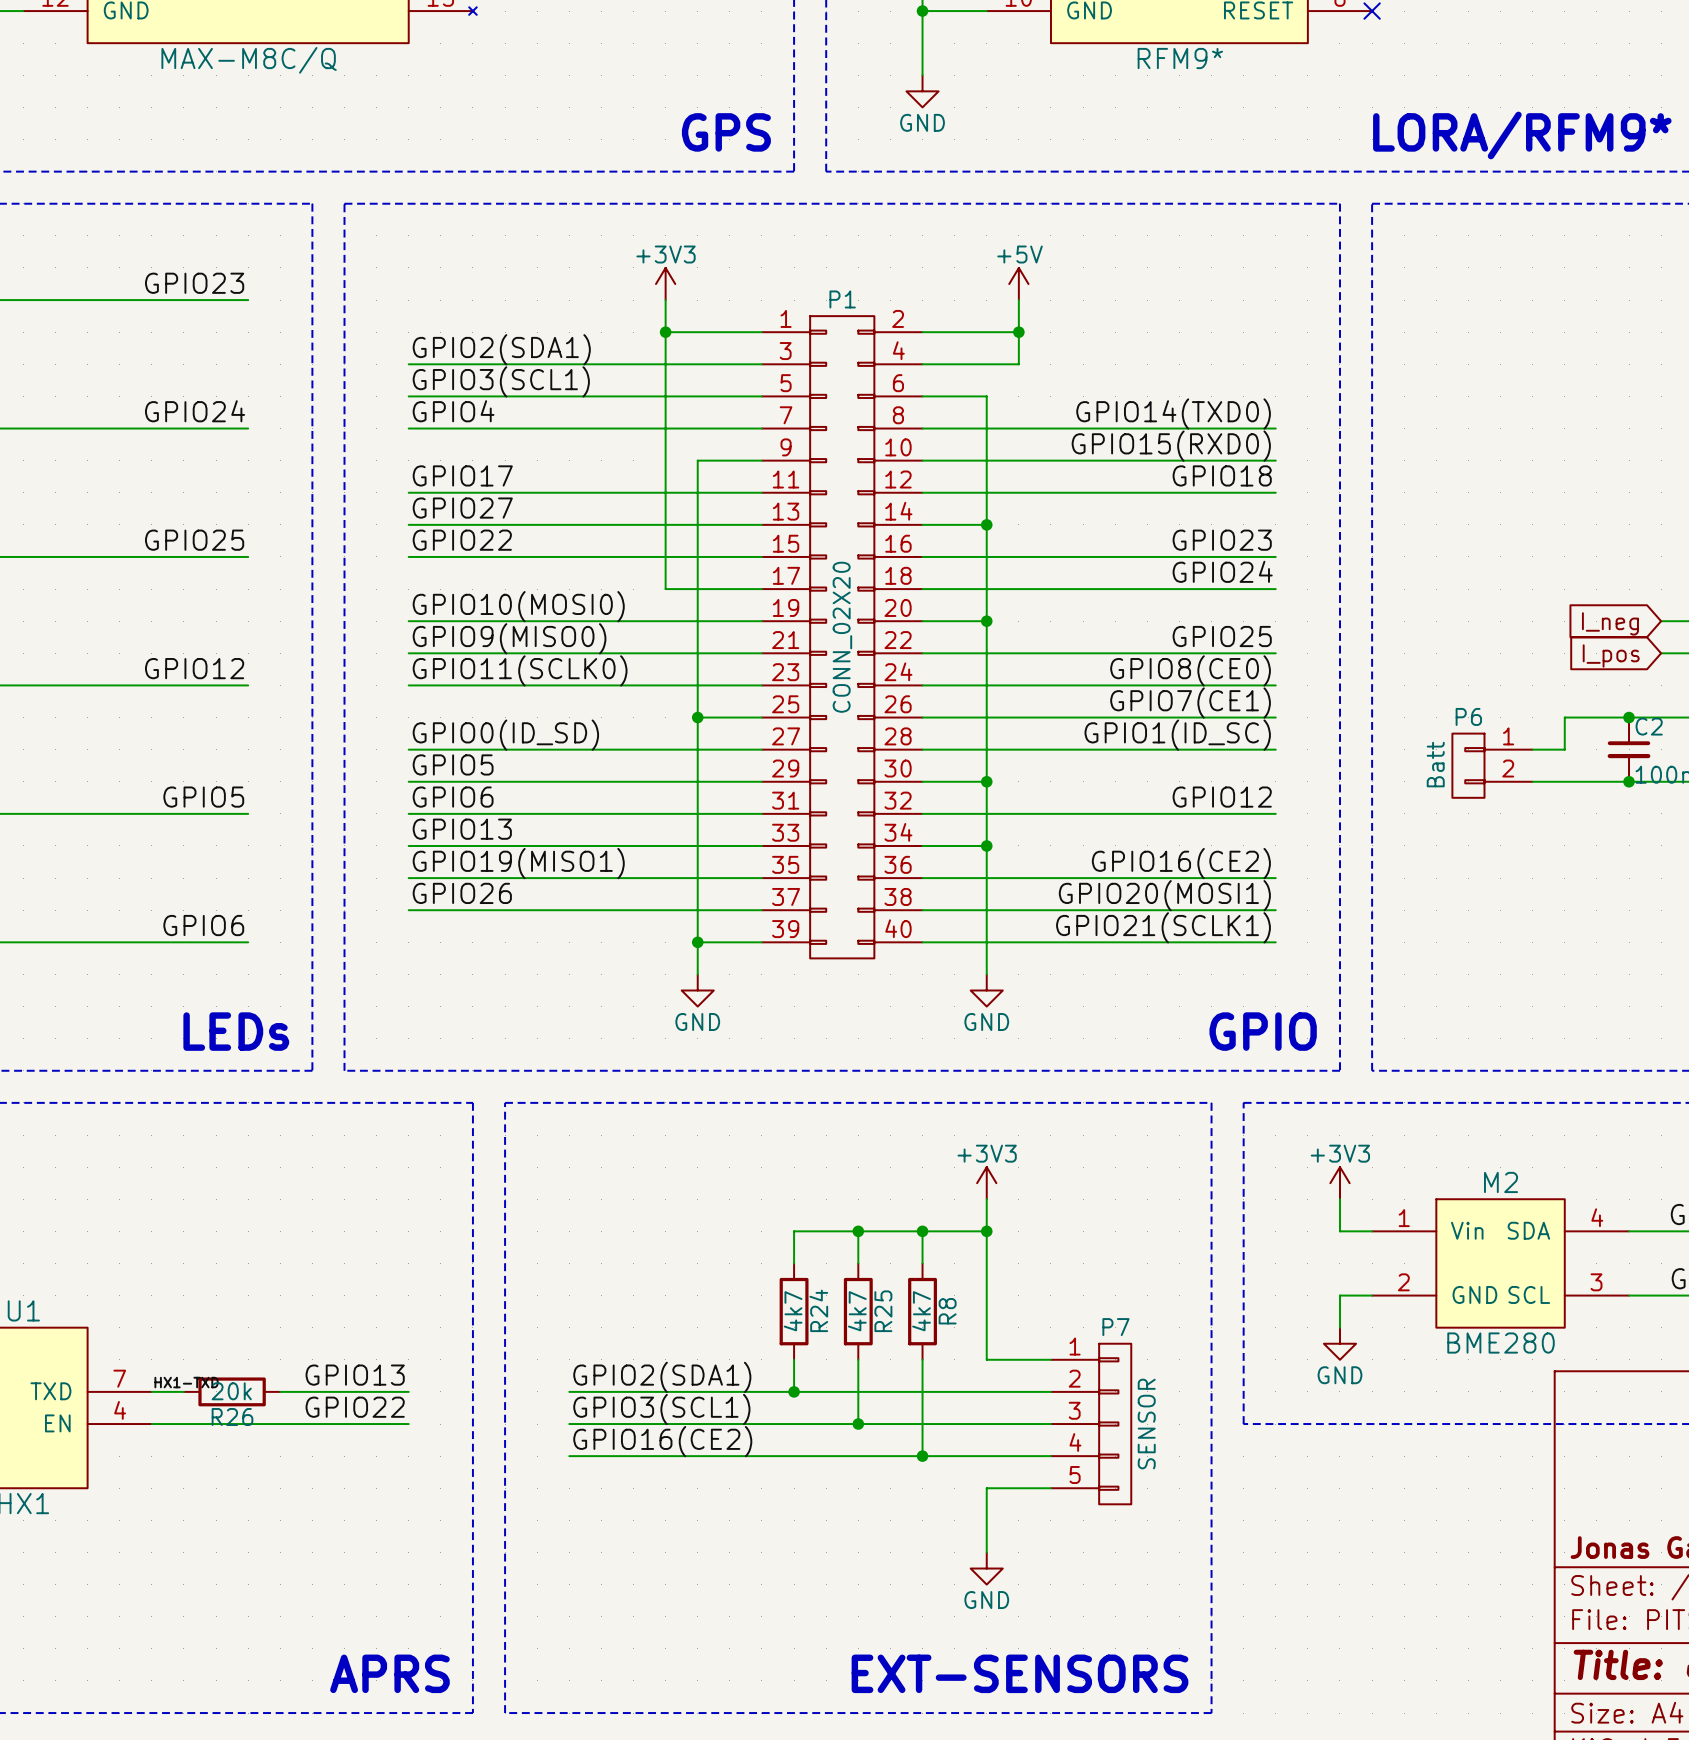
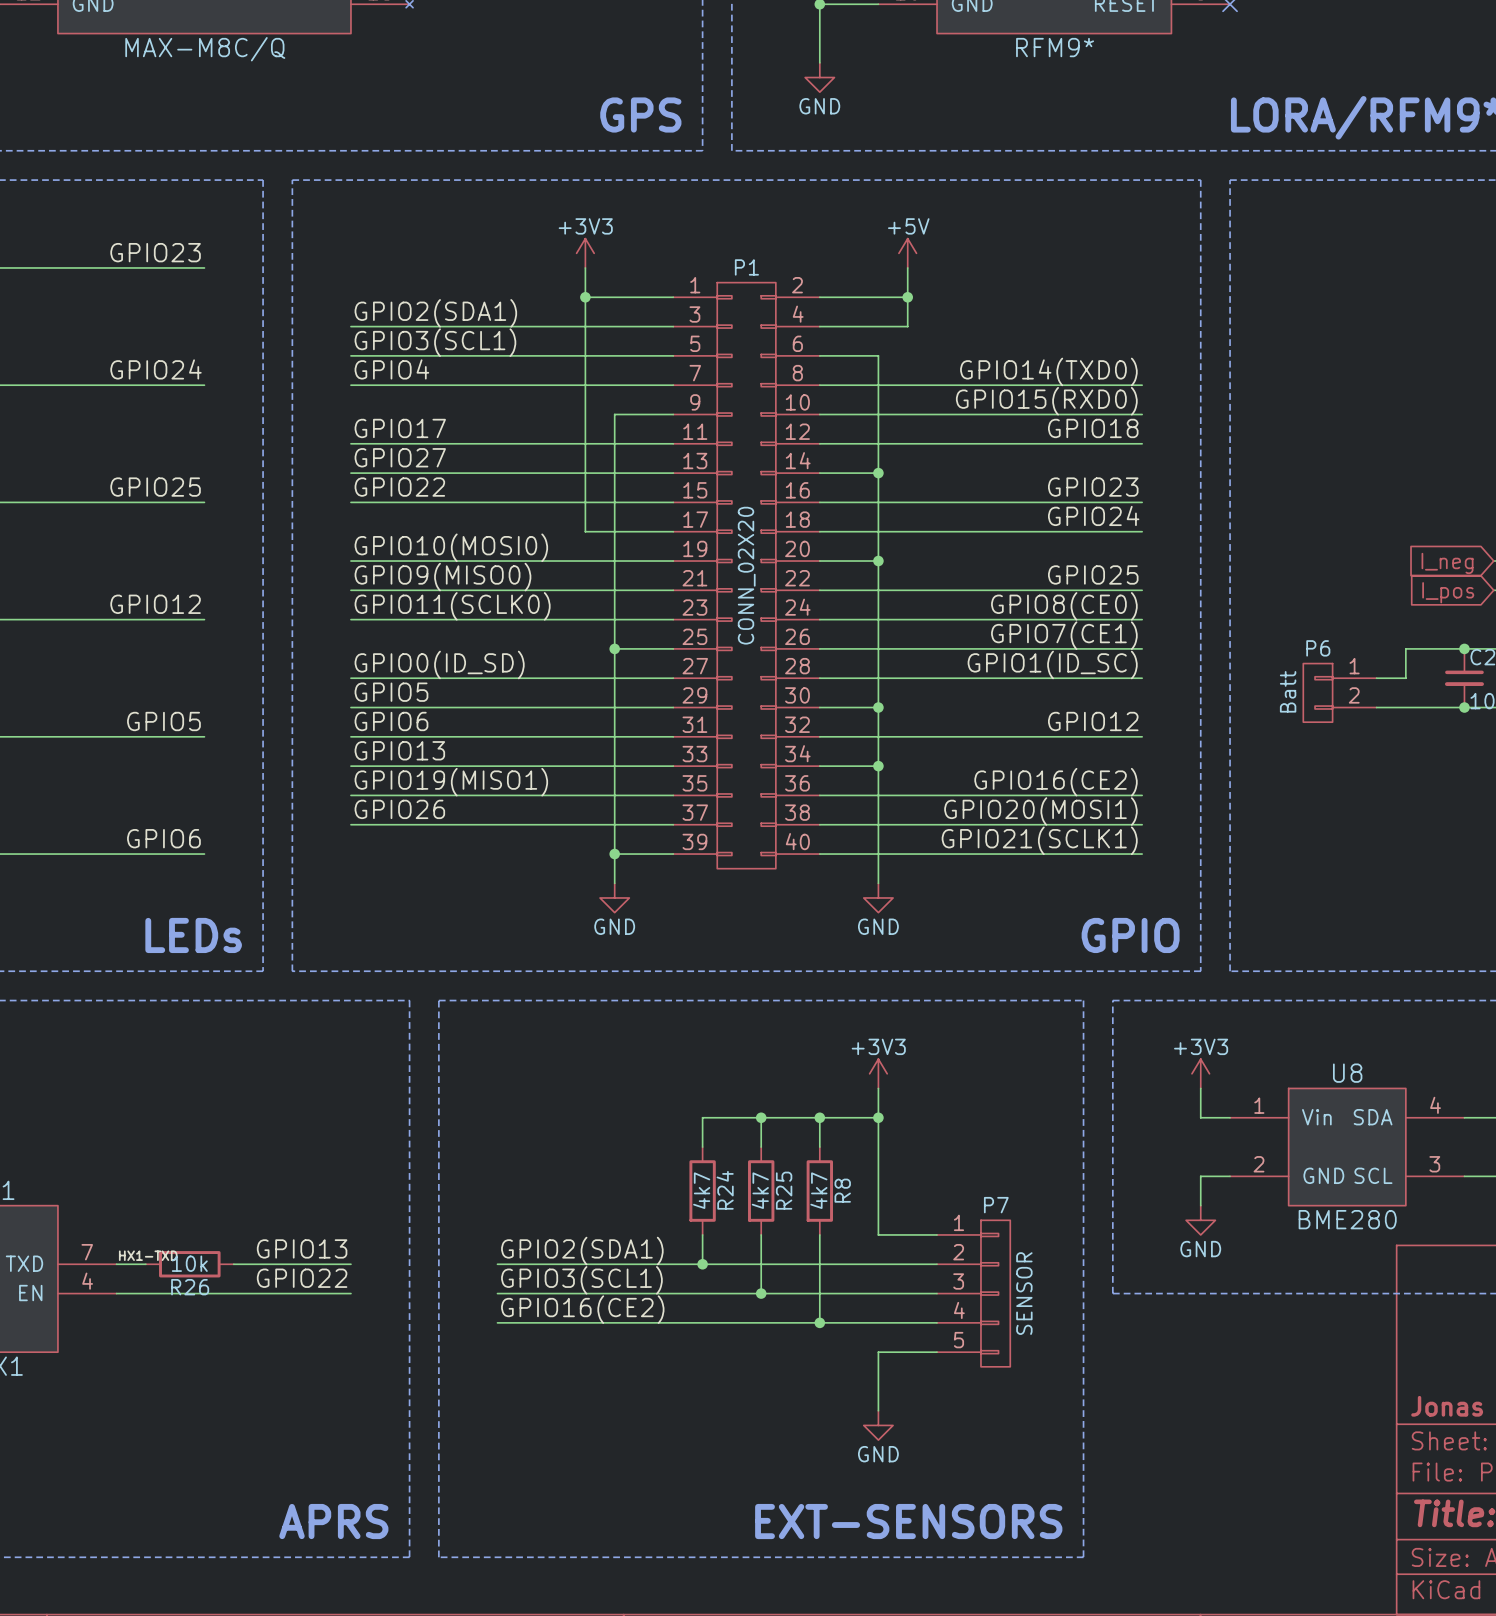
M2 name: M2 (1501, 1182) -> U8 (1347, 1073)
R26 value: 20k (231, 1391) -> 10k (189, 1263)

